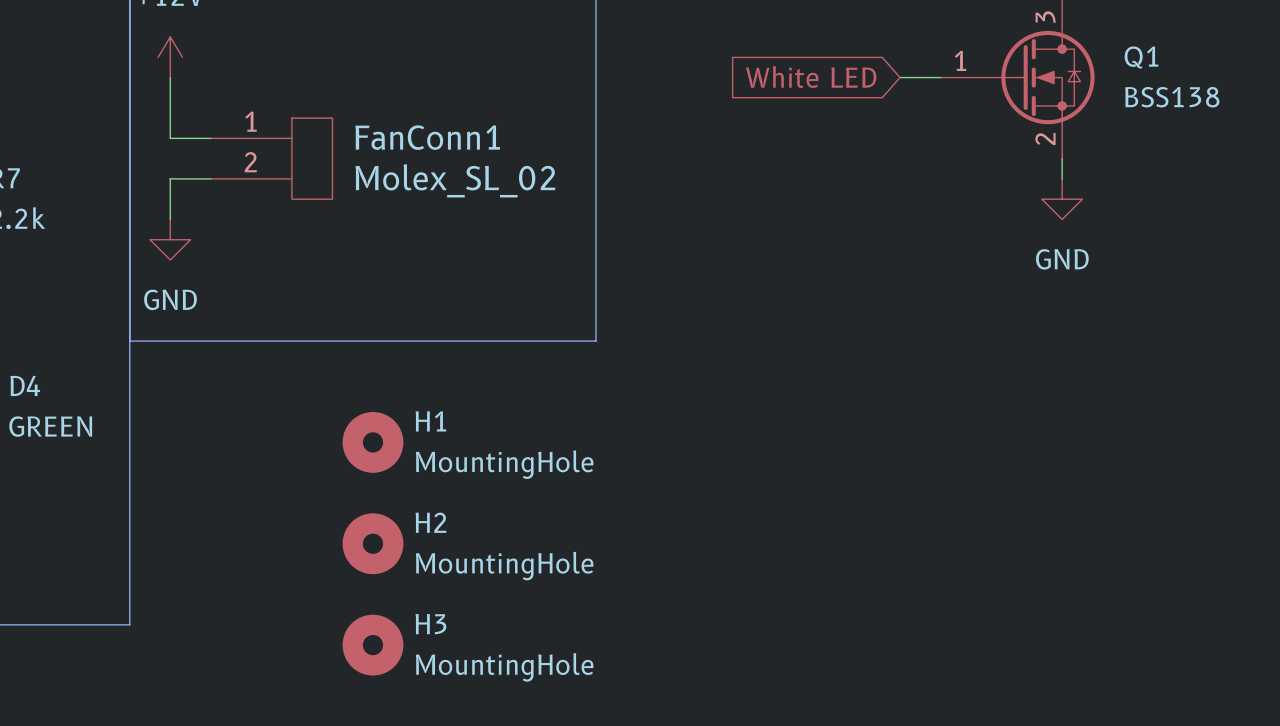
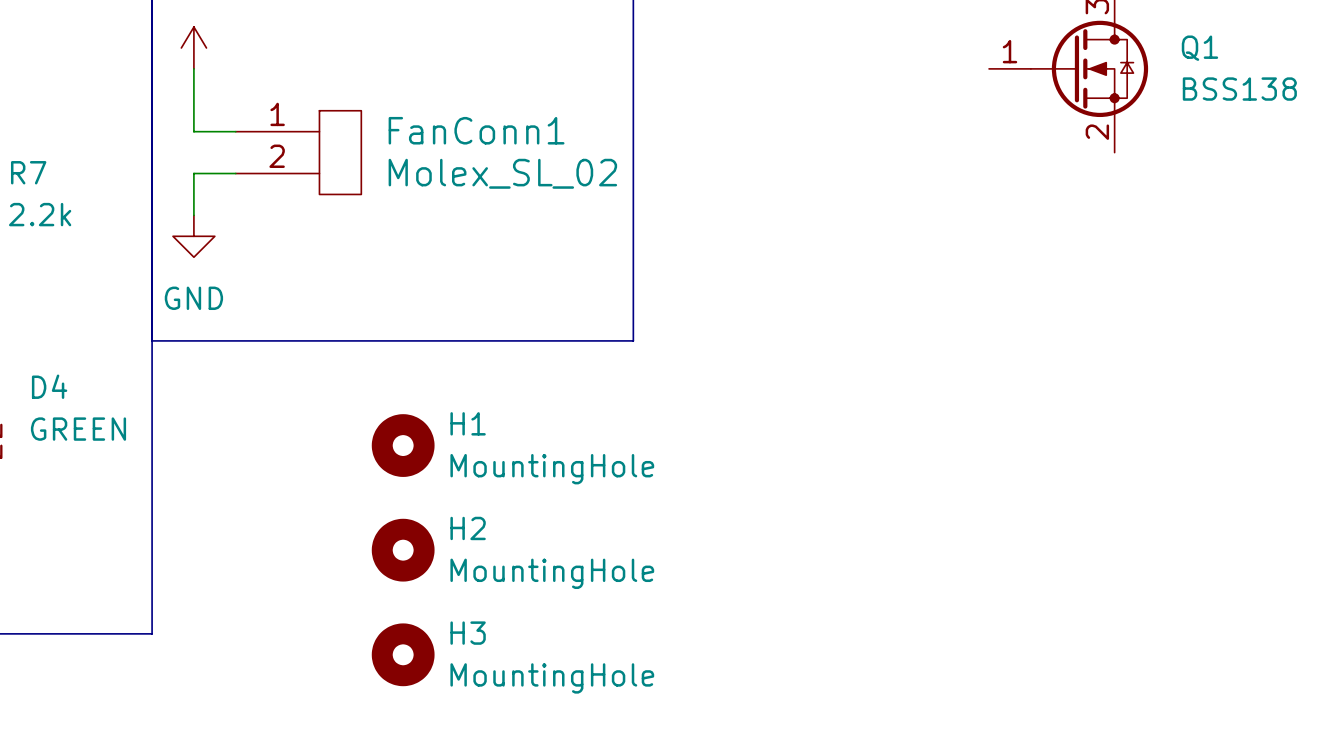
global label: White LED (811, 77) -> none
wire: (900, 77) (940, 77) -> none
wire: (1062, 158) (1062, 178) -> none
power symbol: GND (1062, 199) -> none

